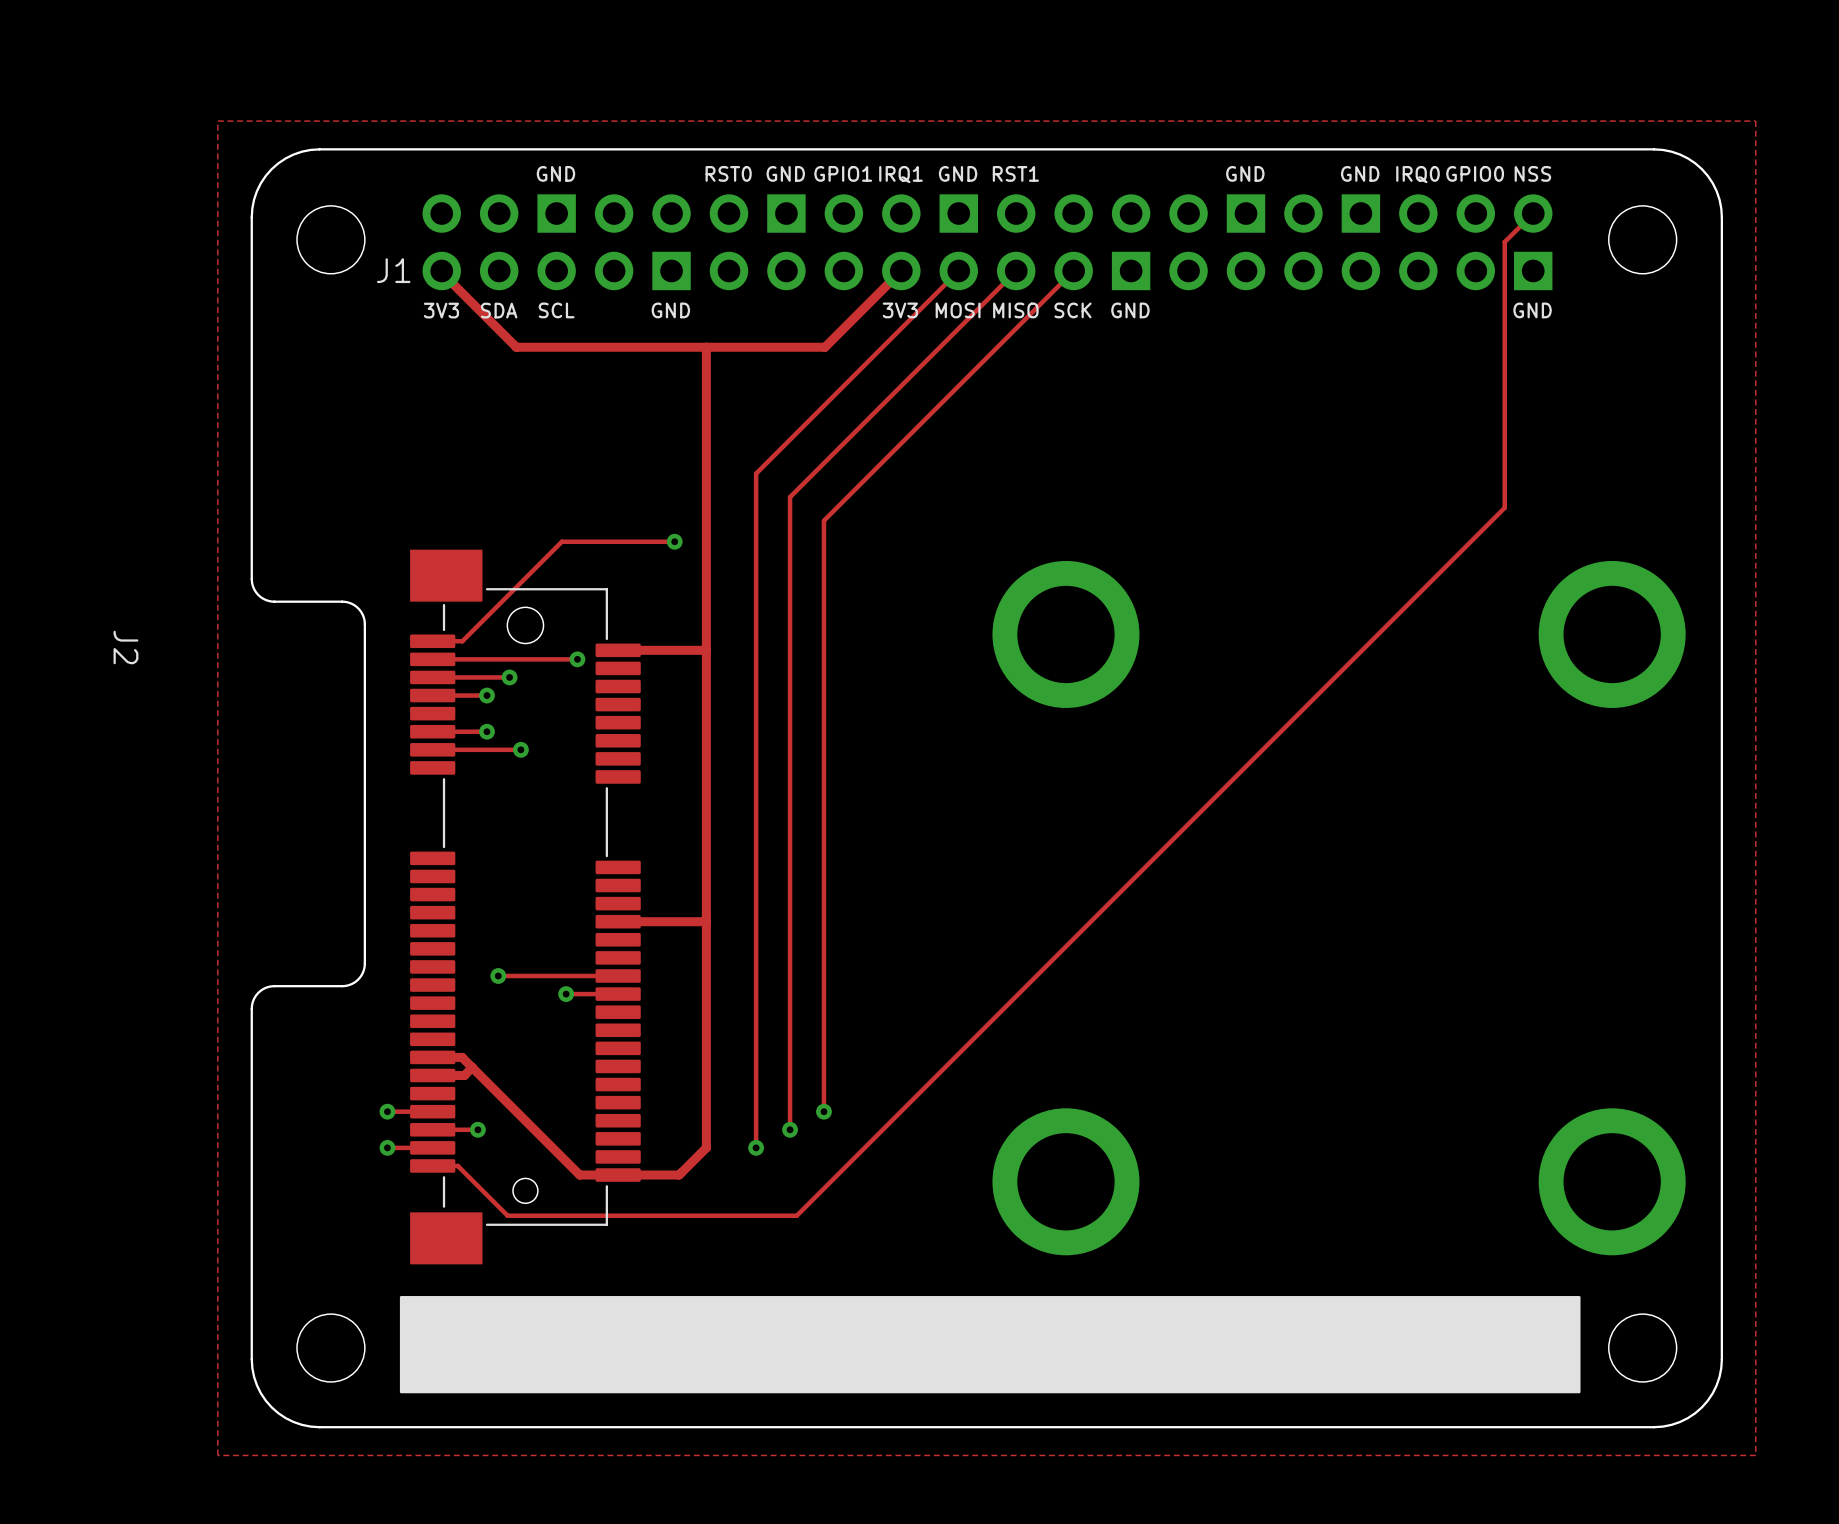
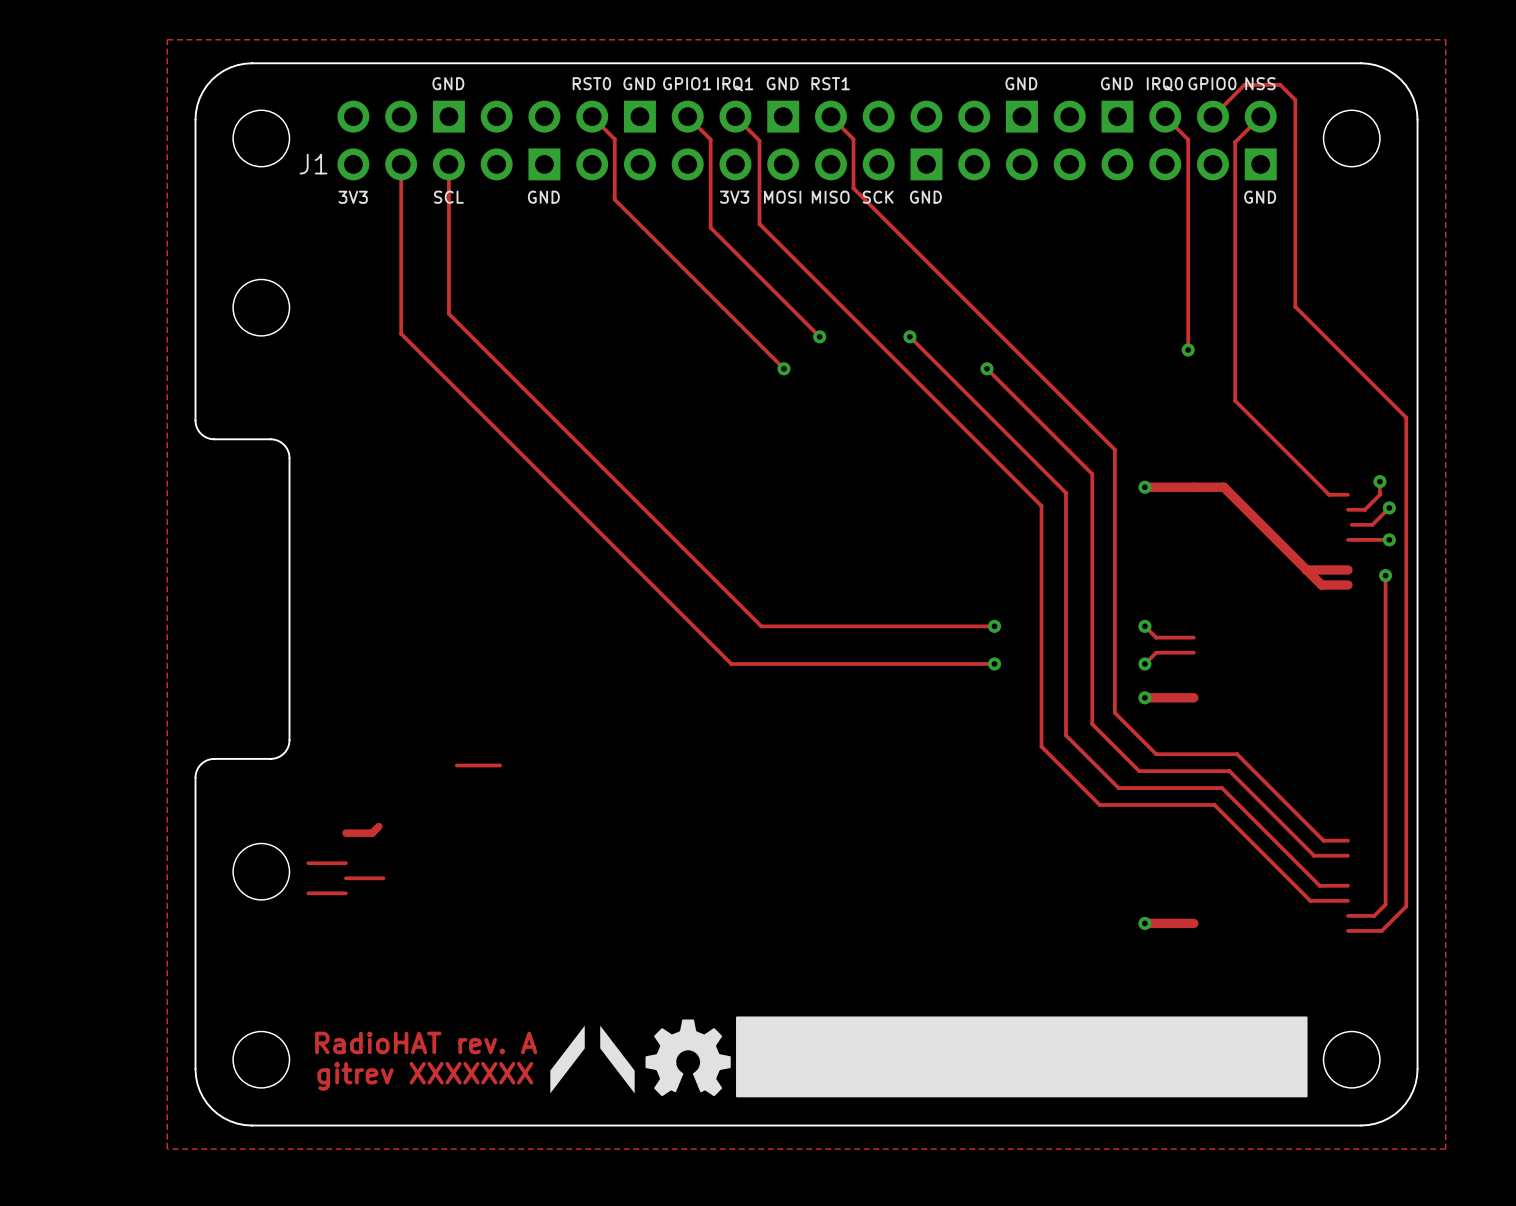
J1 footprint: [250, 148, 1723, 1429] -> [194, 62, 1419, 1127]
track: none -> (592, 116) (614, 139) (614, 199) (783, 368)
track: none -> (687, 116) (710, 139) (710, 227) (819, 336)
track: none -> (735, 116) (759, 140) (759, 224) (1041, 506) (1041, 746) (1099, 804) (1214, 804) (1310, 900) (1347, 900)
track: none -> (830, 116) (853, 139) (853, 188) (1114, 449) (1114, 712) (1156, 754) (1237, 754) (1323, 840) (1347, 840)
track: none -> (1165, 116) (1188, 139) (1188, 349)
track: none -> (1212, 116) (1244, 84) (1280, 84) (1295, 99) (1295, 306) (1406, 417) (1406, 906) (1381, 930) (1347, 930)
track: (1504, 242) (1504, 507) (796, 1215) (507, 1215) (457, 1165) (432, 1165) -> (1237, 140) (1235, 142) (1235, 400) (1329, 494) (1347, 494)
track: (441, 270) (516, 347) (825, 347) (901, 270) -> none
track: none -> (401, 164) (401, 333) (731, 663) (994, 663)
track: none -> (448, 164) (448, 313) (761, 626) (994, 626)
track: (958, 270) (756, 473) (756, 1147) -> none
track: (1016, 270) (790, 497) (790, 1129) -> none
track: (1073, 270) (823, 520) (823, 1111) -> none
track: (706, 347) (706, 1147) (679, 1175) (579, 1175) (462, 1057) (432, 1057) -> none
via: none -> (819, 336)
track: none -> (909, 336) (1065, 492) (1065, 735) (1118, 788) (1222, 788) (1319, 885) (1347, 885)
via: none -> (909, 336)
via: none -> (1188, 349)
via: none -> (783, 368)
track: none -> (987, 368) (1092, 474) (1092, 724) (1139, 771) (1229, 771) (1314, 855) (1347, 855)
via: none -> (987, 368)
track: (674, 541) (561, 541) (462, 641) (432, 641) -> none
via: (674, 541) -> none
track: (618, 650) (706, 650) -> none
track: none -> (1379, 481) (1379, 494) (1364, 509) (1347, 509)
via: none -> (1379, 481)
track: (432, 659) (577, 659) -> none
via: (577, 659) -> none
track: none -> (1144, 487) (1223, 487) (1321, 585) (1347, 585)
via: none -> (1144, 487)
track: (432, 677) (509, 677) -> none
via: (509, 677) -> none
track: none -> (1389, 507) (1372, 524) (1351, 524)
via: none -> (1389, 507)
track: (432, 695) (486, 695) -> none
via: (486, 695) -> none
track: none -> (1347, 539) (1389, 539)
via: none -> (1389, 539)
track: (432, 731) (486, 731) -> none
via: (486, 731) -> none
track: (432, 749) (520, 749) -> none
via: (520, 749) -> none
track: none -> (1306, 569) (1347, 569)
track: none -> (1385, 575) (1385, 904) (1374, 915) (1347, 915)
via: none -> (1385, 575)
via: none -> (994, 626)
track: none -> (1144, 626) (1156, 637) (1193, 637)
via: none -> (1144, 626)
track: none -> (1193, 652) (1156, 652) (1144, 663)
via: none -> (994, 663)
via: none -> (1144, 663)
J2: (1047, 907) -> none
track: none -> (1144, 697) (1193, 697)
via: none -> (1144, 697)
track: (618, 921) (706, 921) -> none
track: (498, 975) (618, 975) -> none
via: (498, 975) -> none
via: (566, 994) -> none
via: (387, 1111) -> none
via: (823, 1111) -> none
via: (477, 1129) -> none
via: (790, 1129) -> none
via: (387, 1147) -> none
via: (756, 1147) -> none
track: none -> (1144, 923) (1193, 923)
via: none -> (1144, 923)
drawing: [399, 1296, 1581, 1394] -> none
drawing: none -> [550, 1016, 1308, 1098]
text: none -> RadioHAT rev. A (426, 1042)
text: none -> gitrev XXXXXXX (425, 1076)

